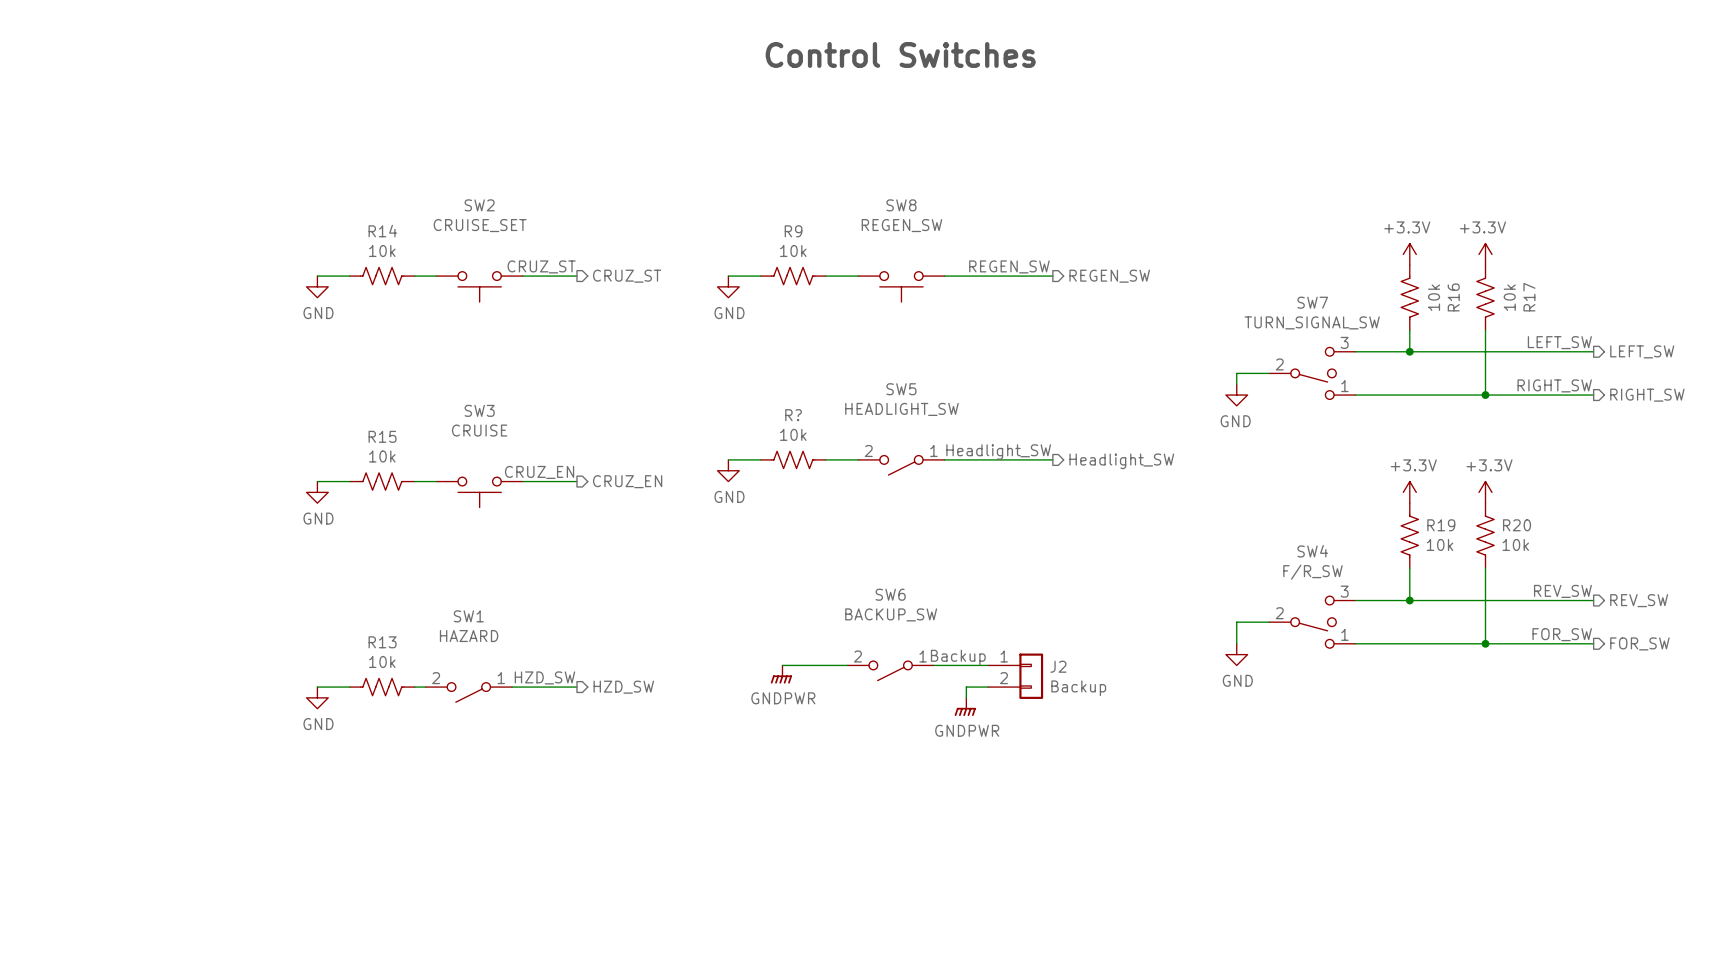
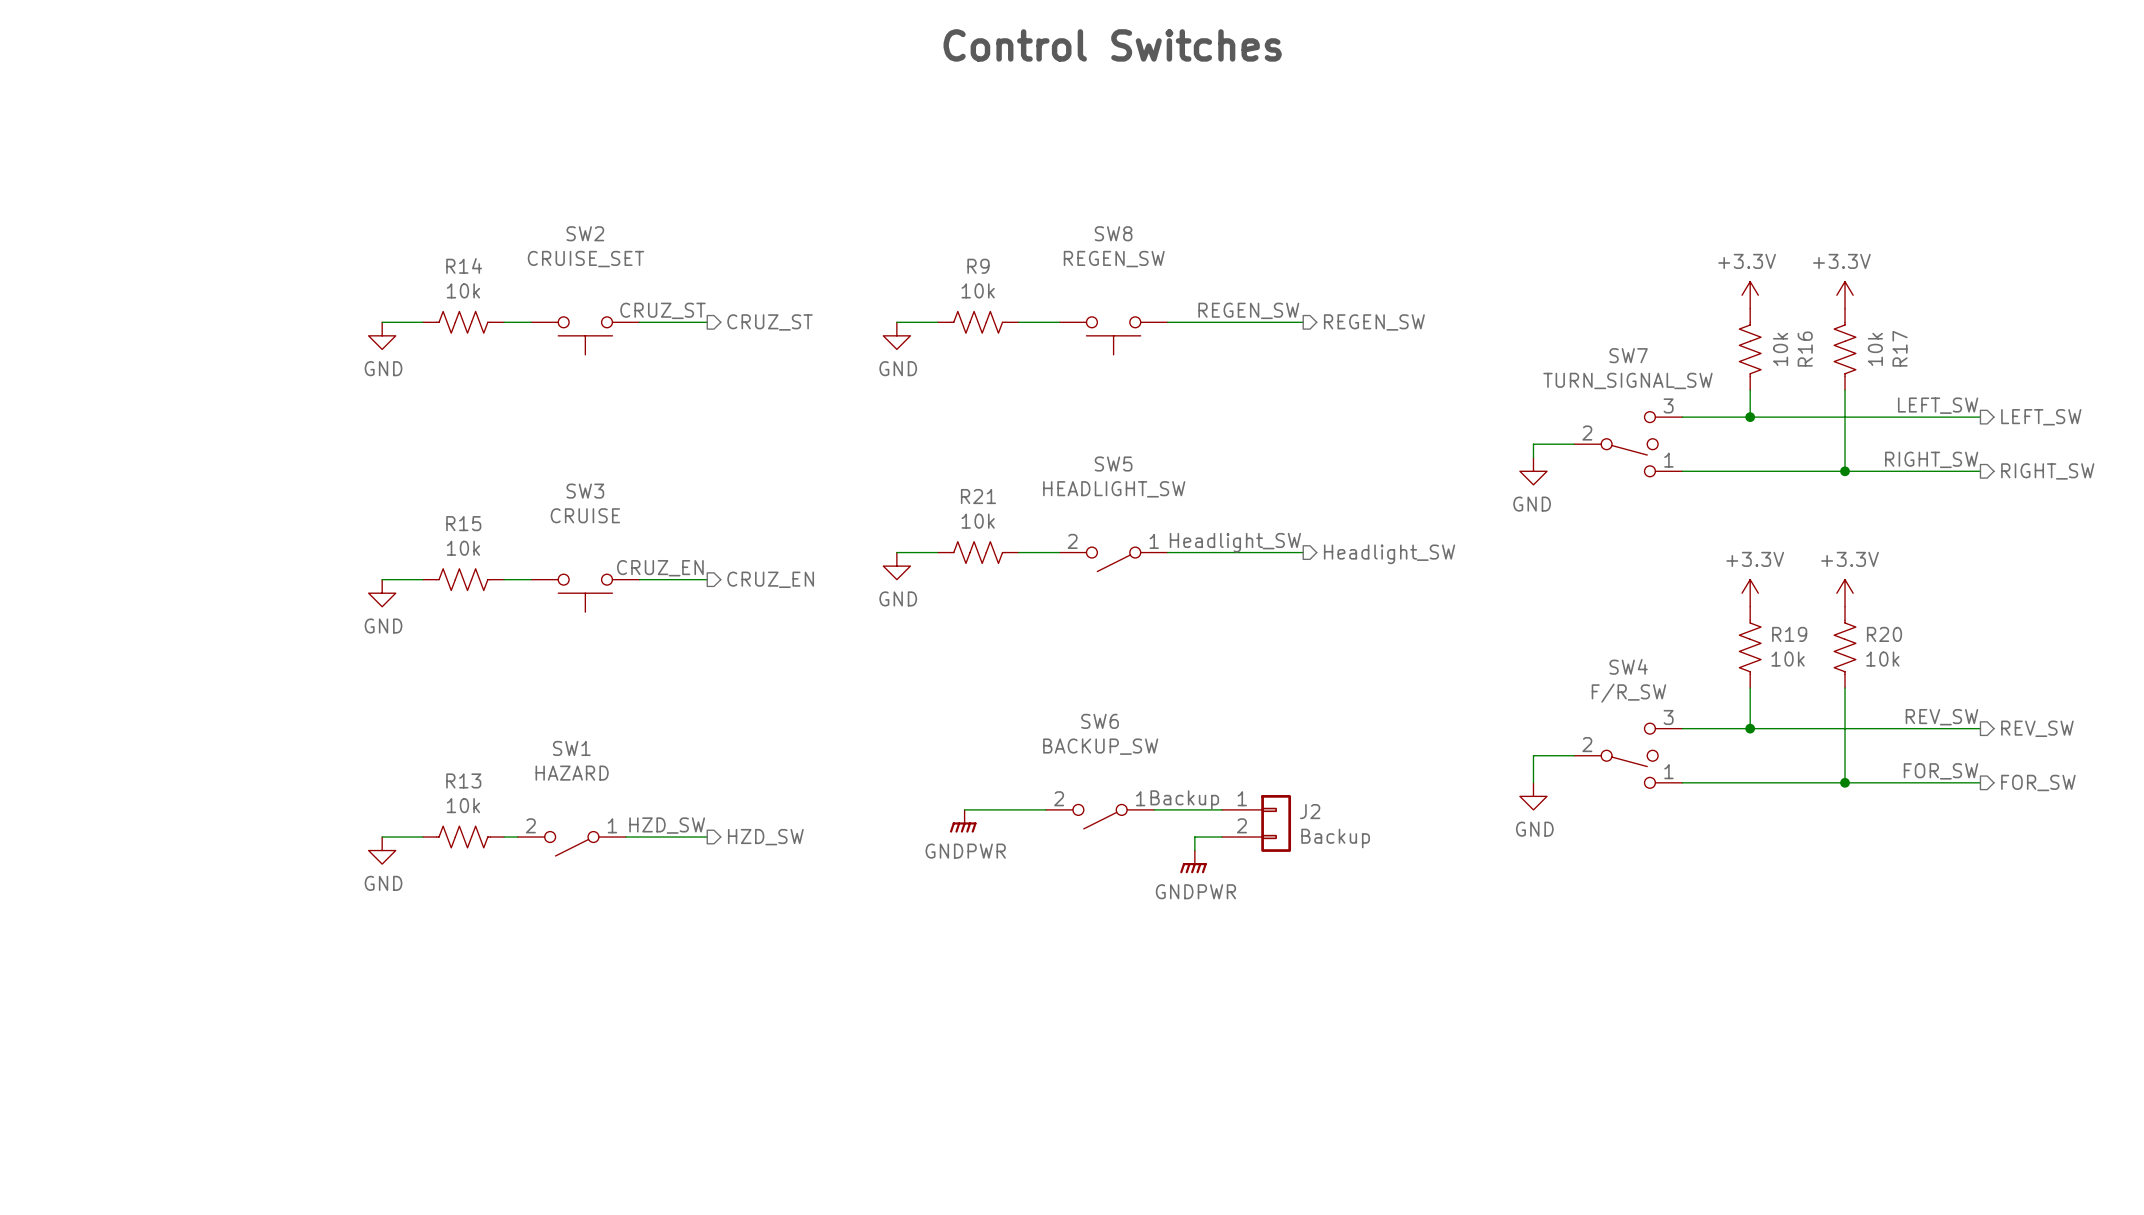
R? name: R? (793, 415) -> R21 (978, 496)

